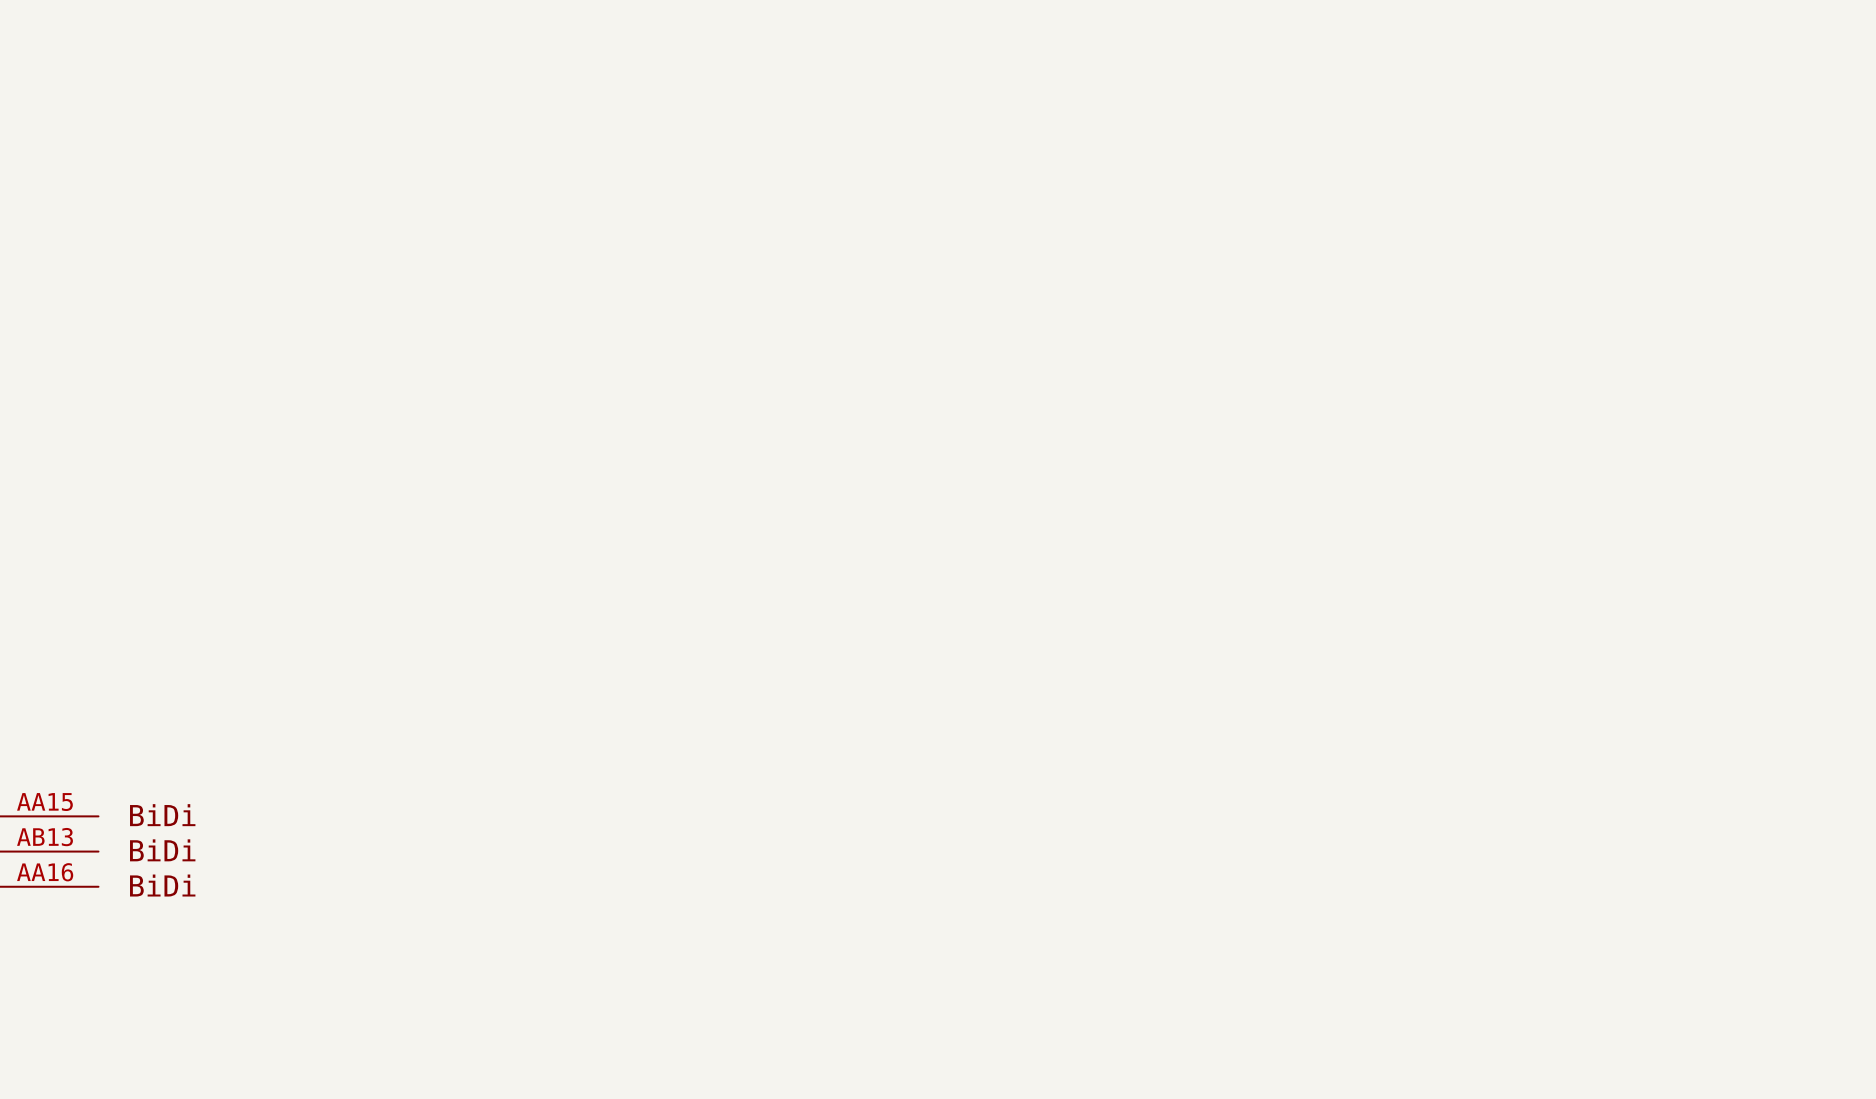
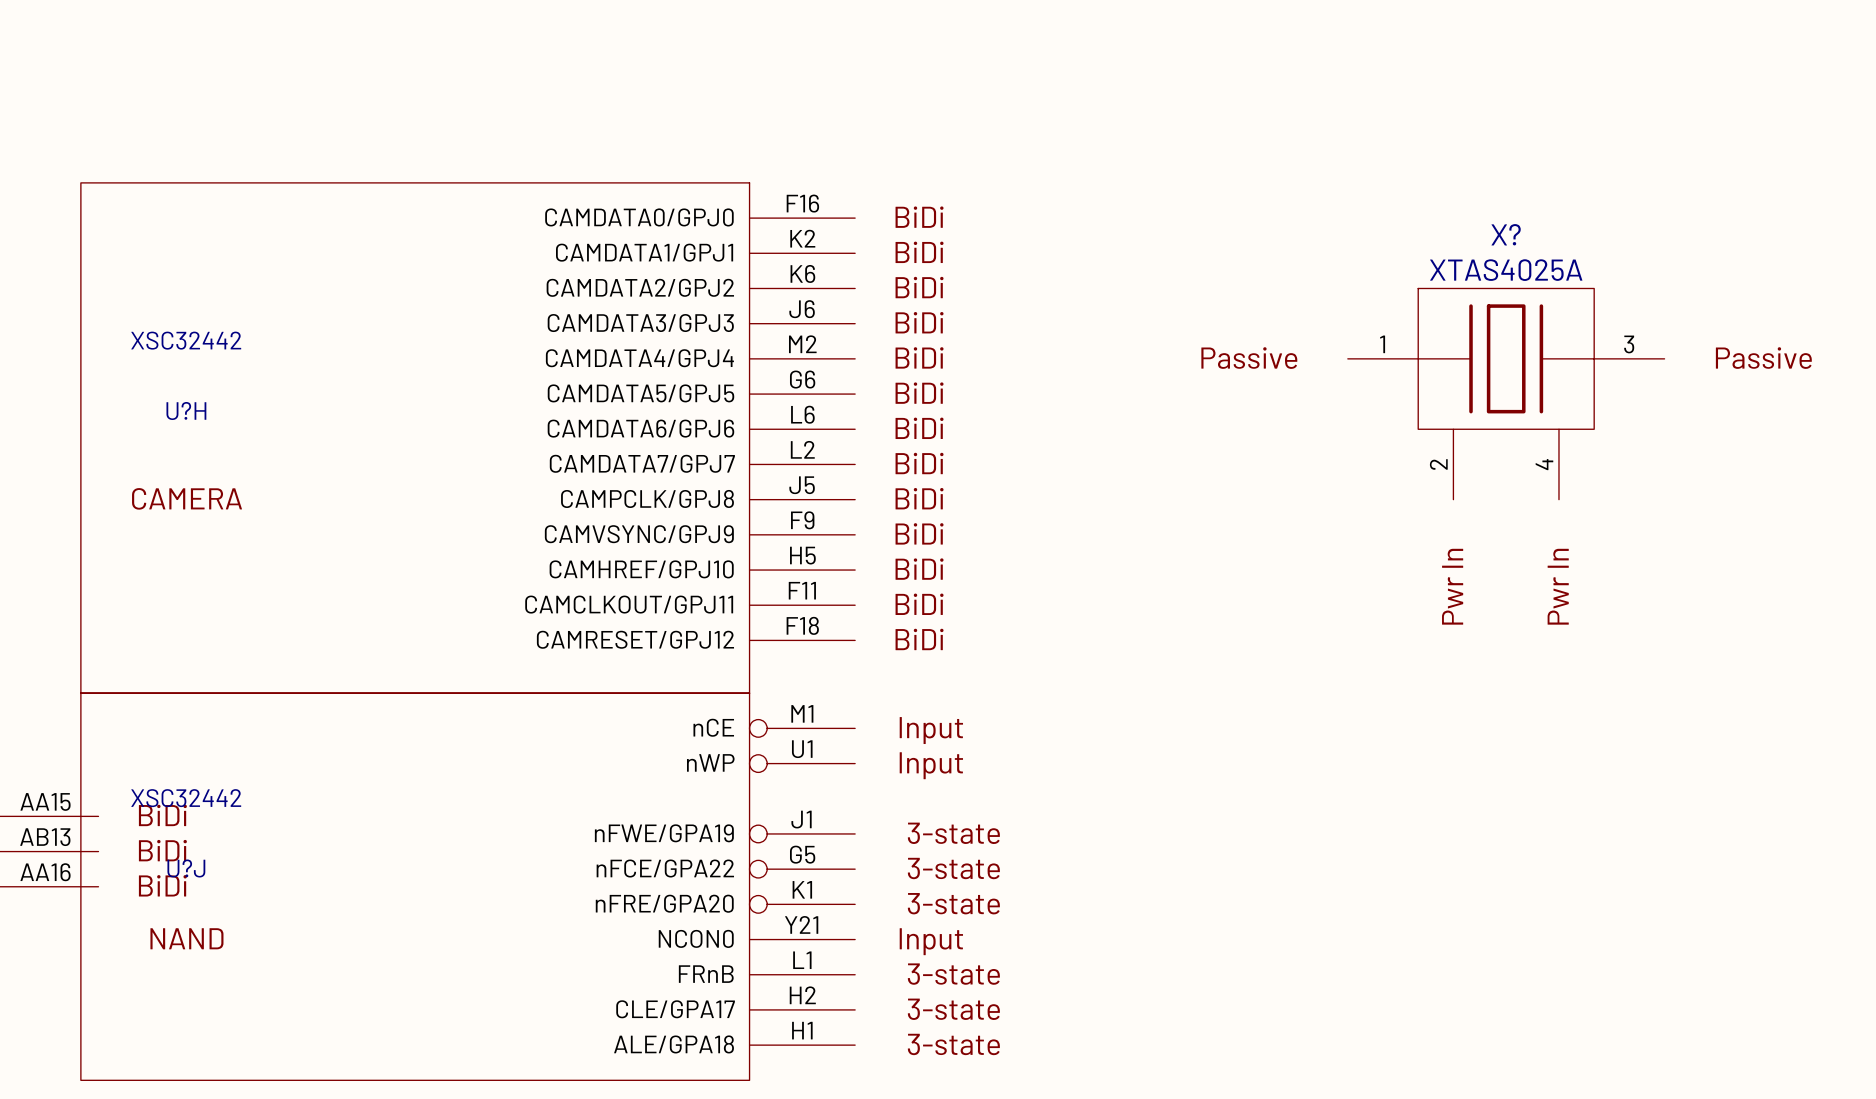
X?: none -> XTAS4025A (1506, 394)
U?H: none -> XSC32442 (468, 438)
U?J: none -> XSC32442 (468, 886)

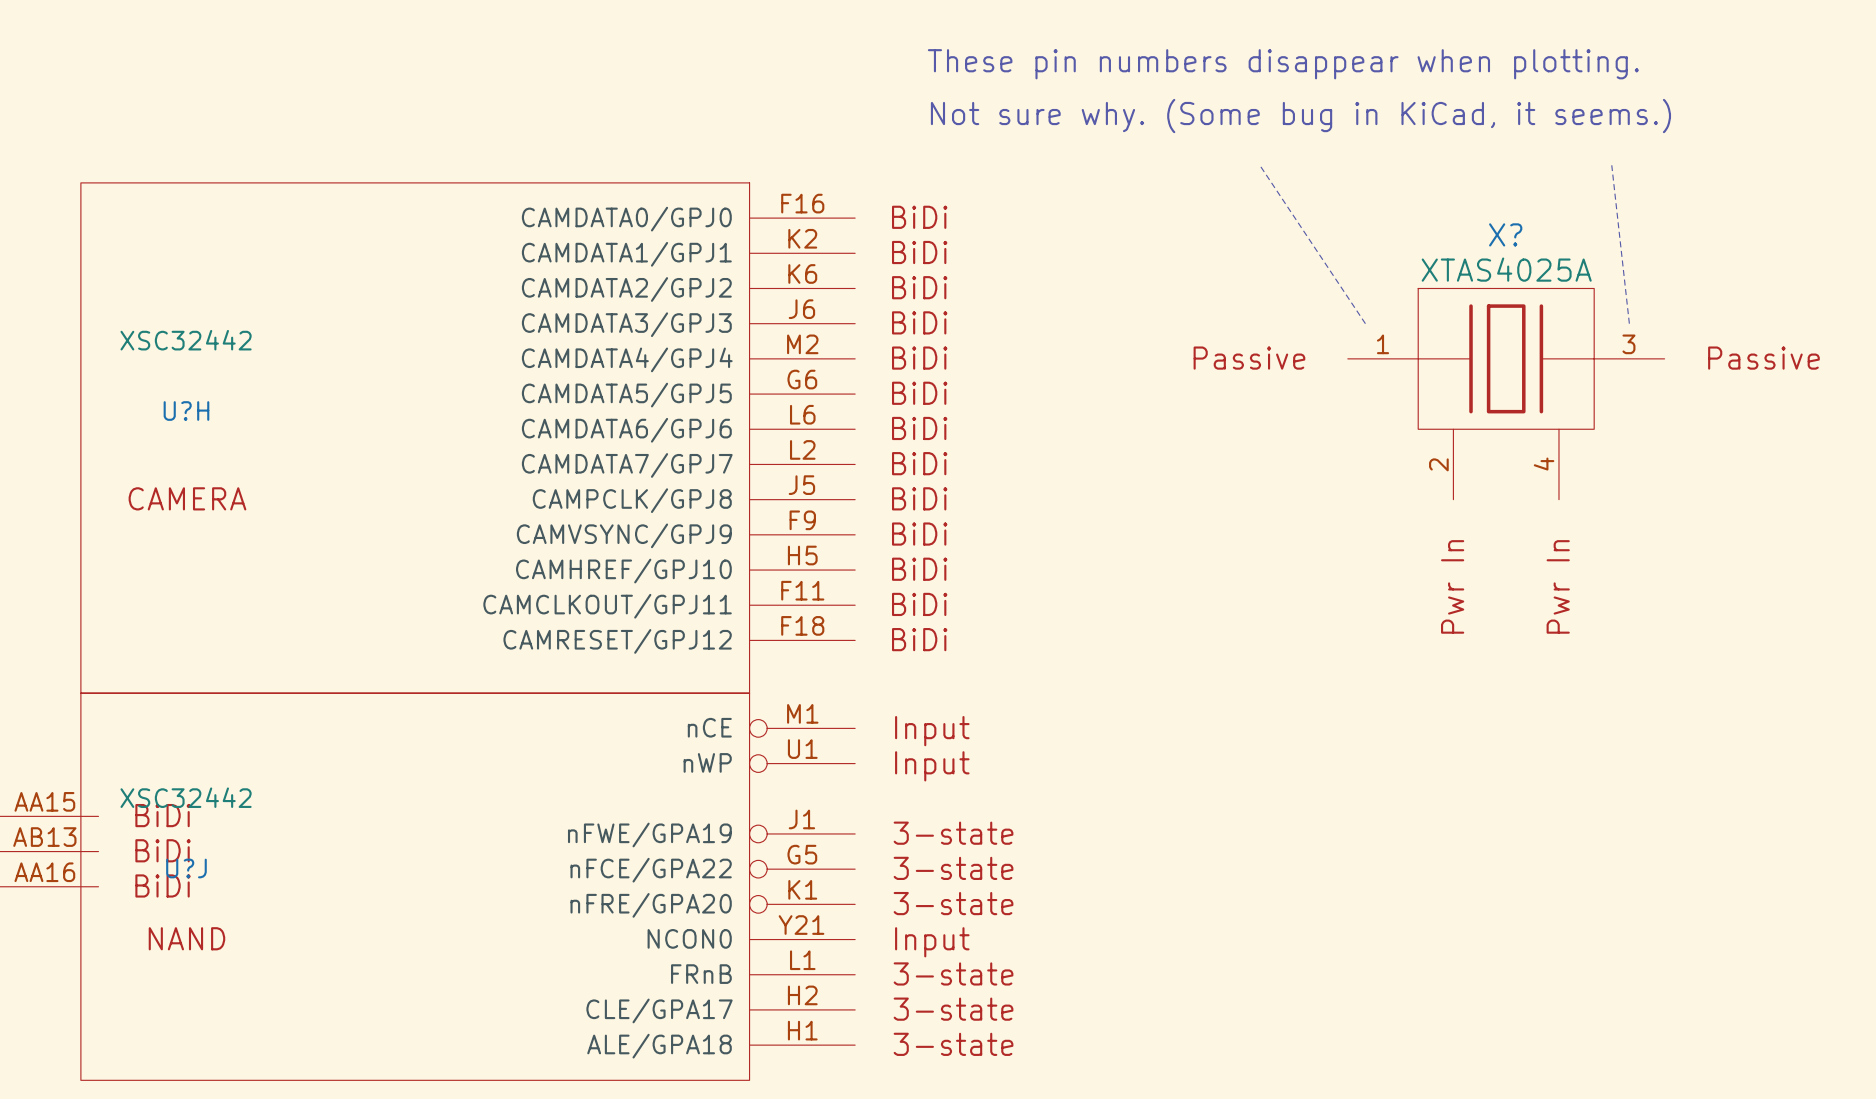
text: none -> These pin numbers disappear when plotting. (1283, 64)
text: none -> Not sure why. (Some bug in KiCad, it seems.) (1300, 116)
line: none -> (1259, 165) (1365, 323)
line: none -> (1611, 165) (1629, 323)

